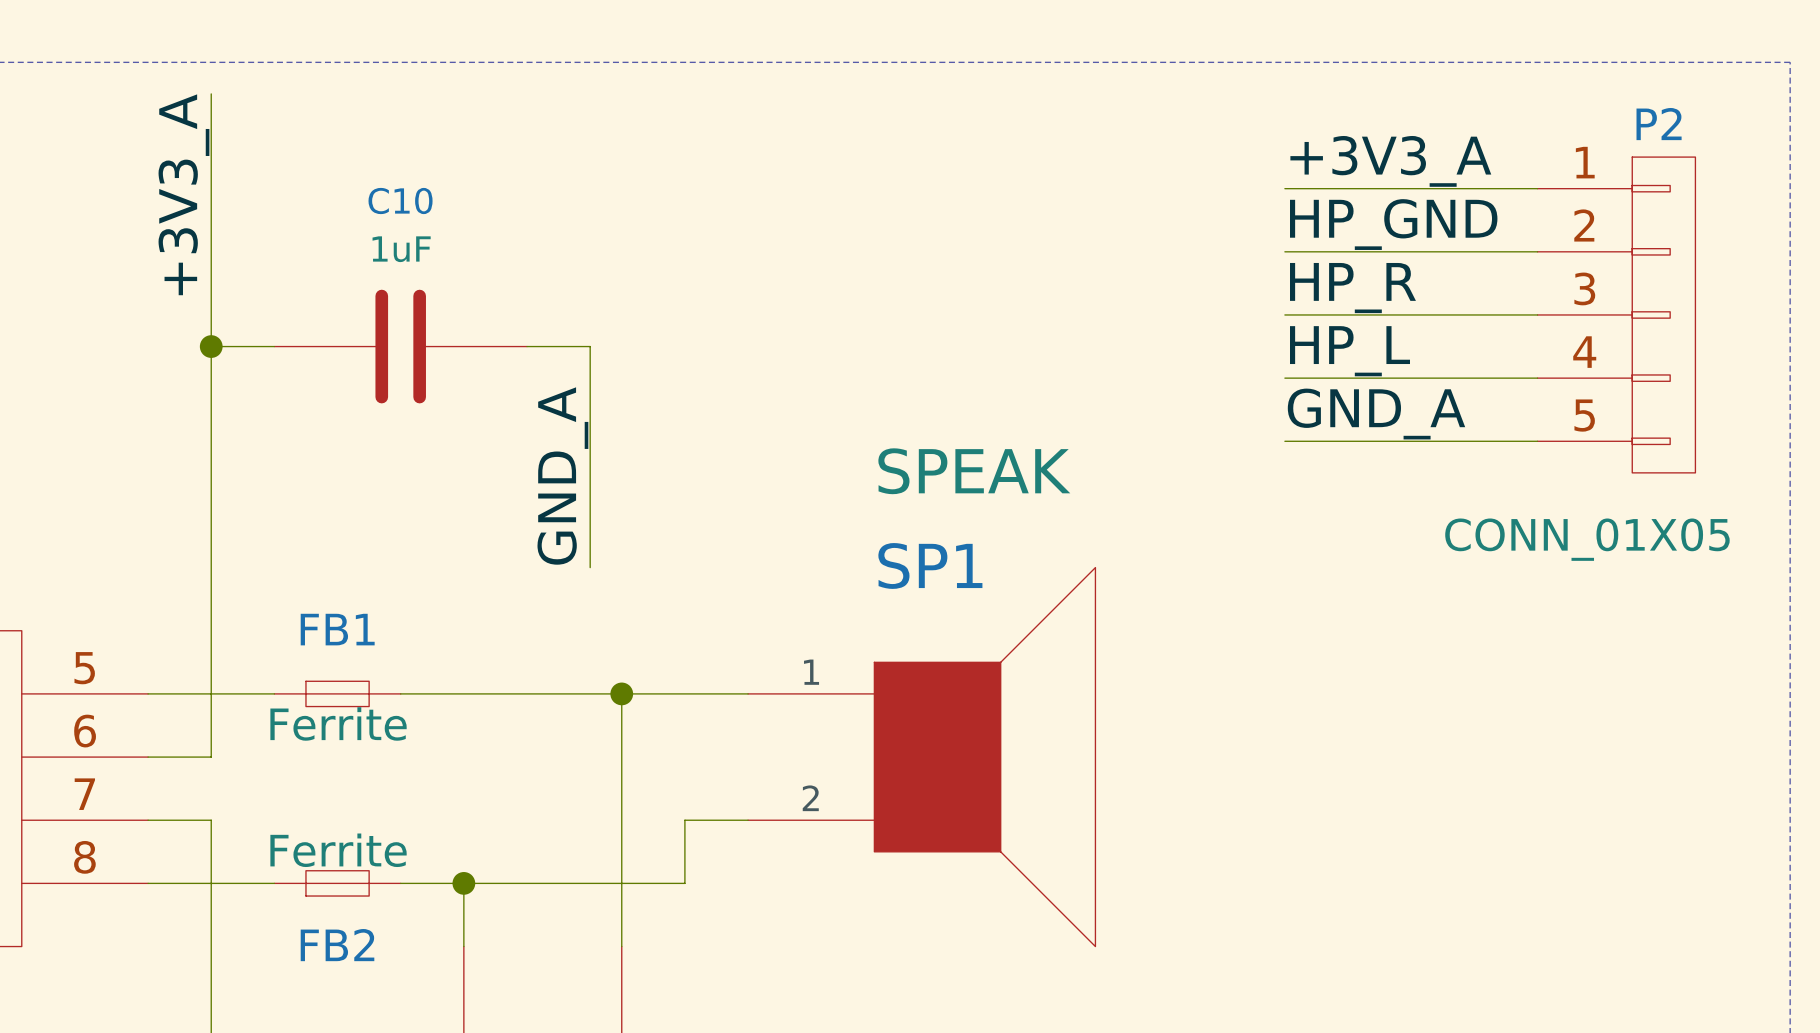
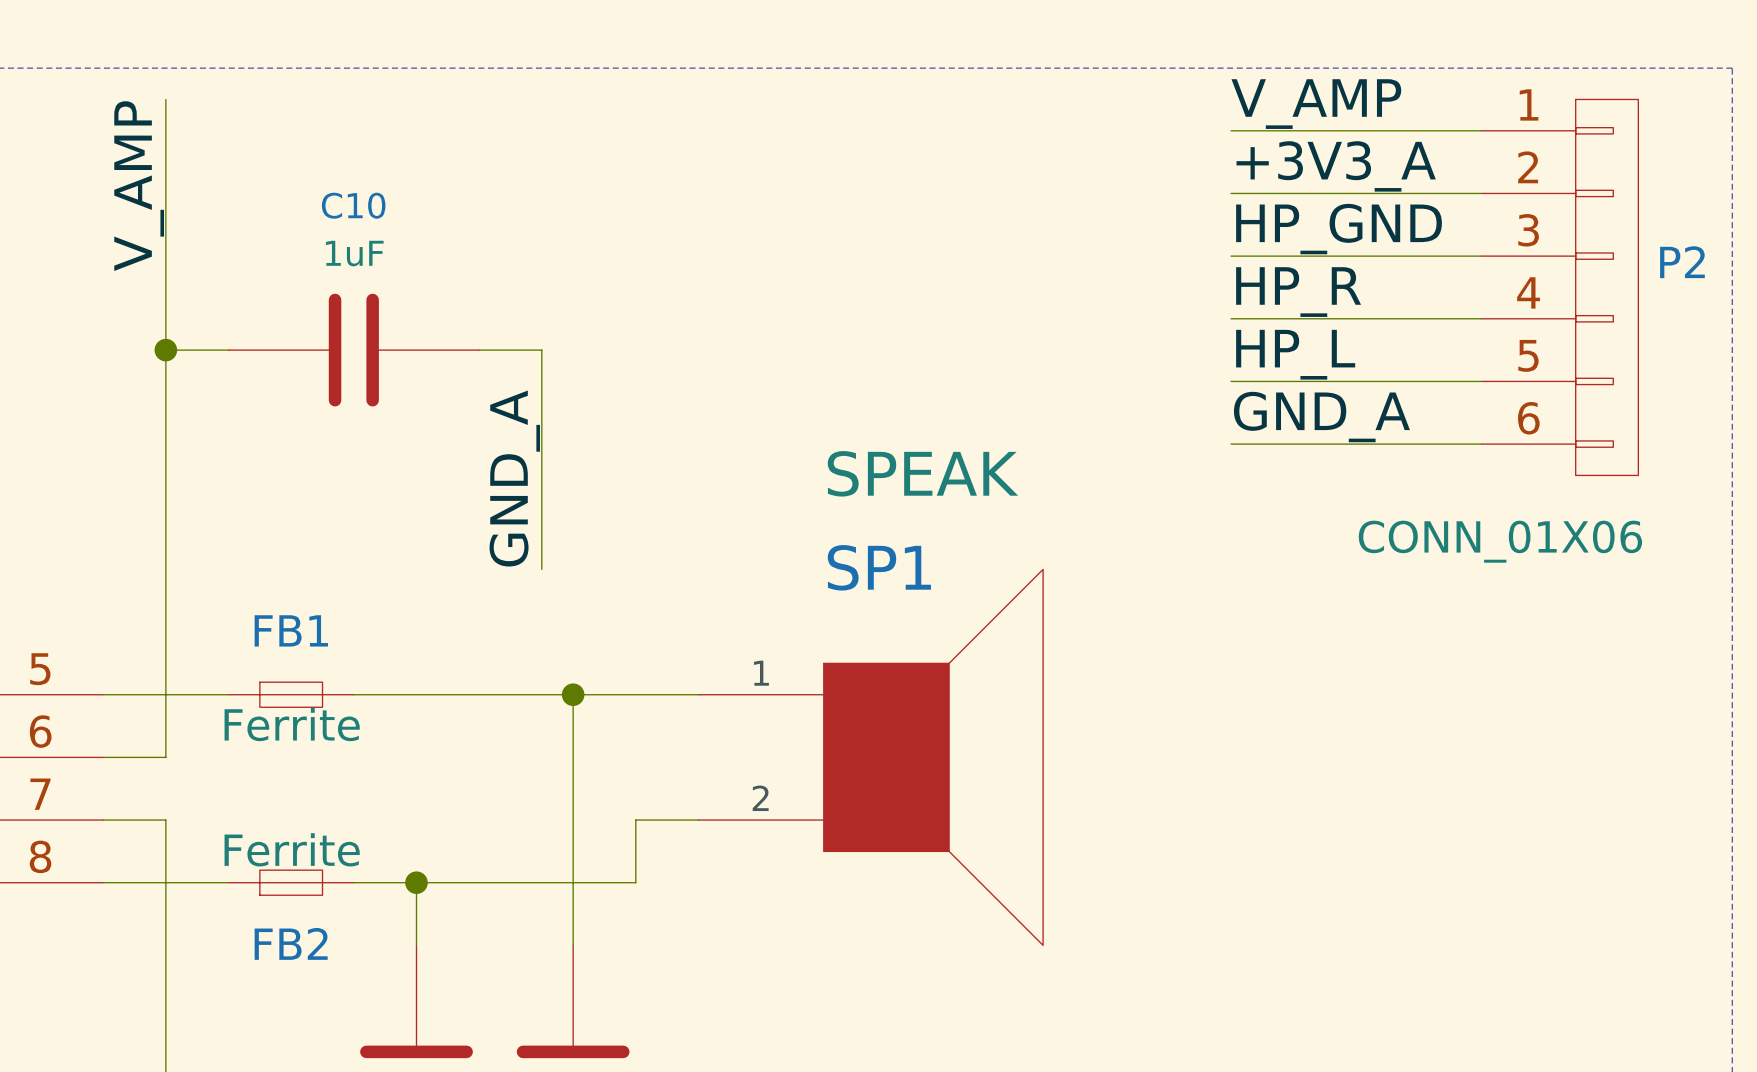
label: none -> V_AMP (1316, 104)
P2 name position: P2 (1659, 124) -> P2 (1682, 262)
wire: none -> (1231, 130) (1481, 130)
P2 symbol: [1537, 157, 1696, 473] -> [1481, 99, 1639, 476]
label: +3V3_A (183, 194) -> V_AMP (139, 186)
P2 value: CONN_01X05 (1587, 539) -> CONN_01X06 (1500, 541)

